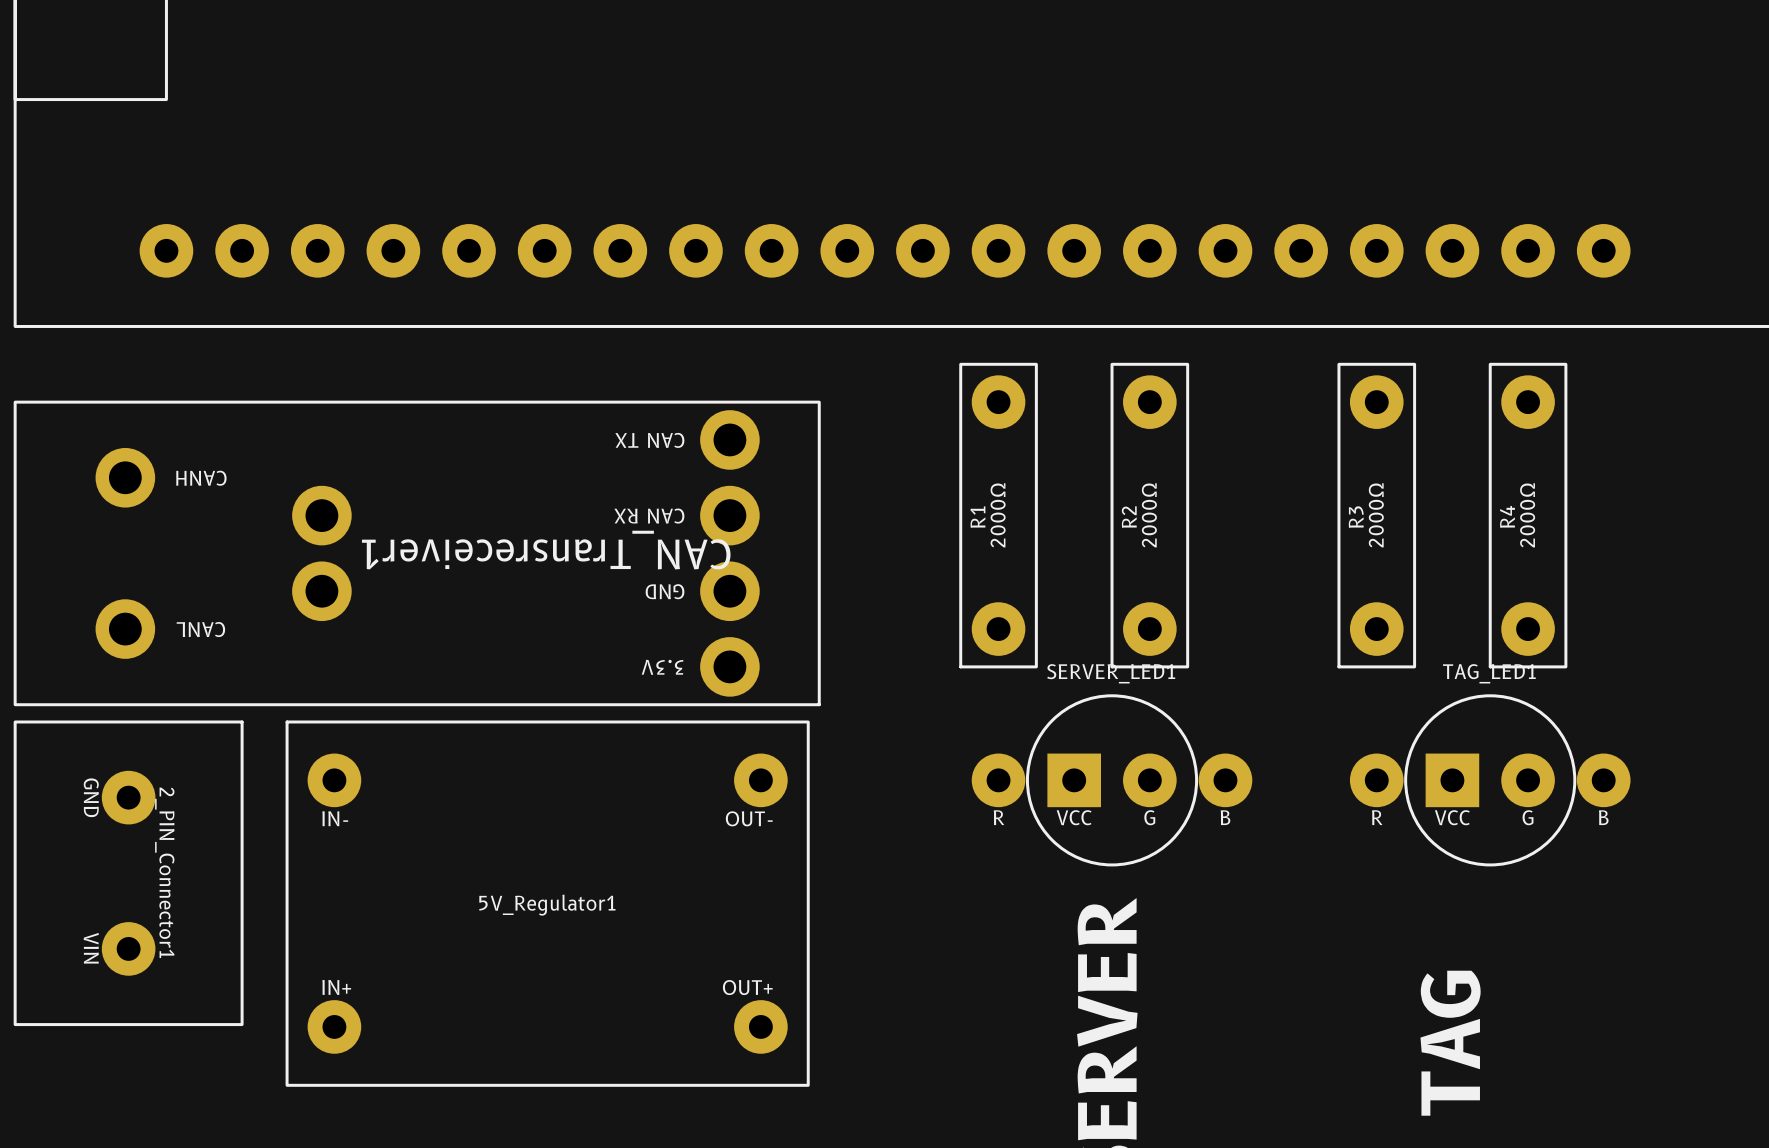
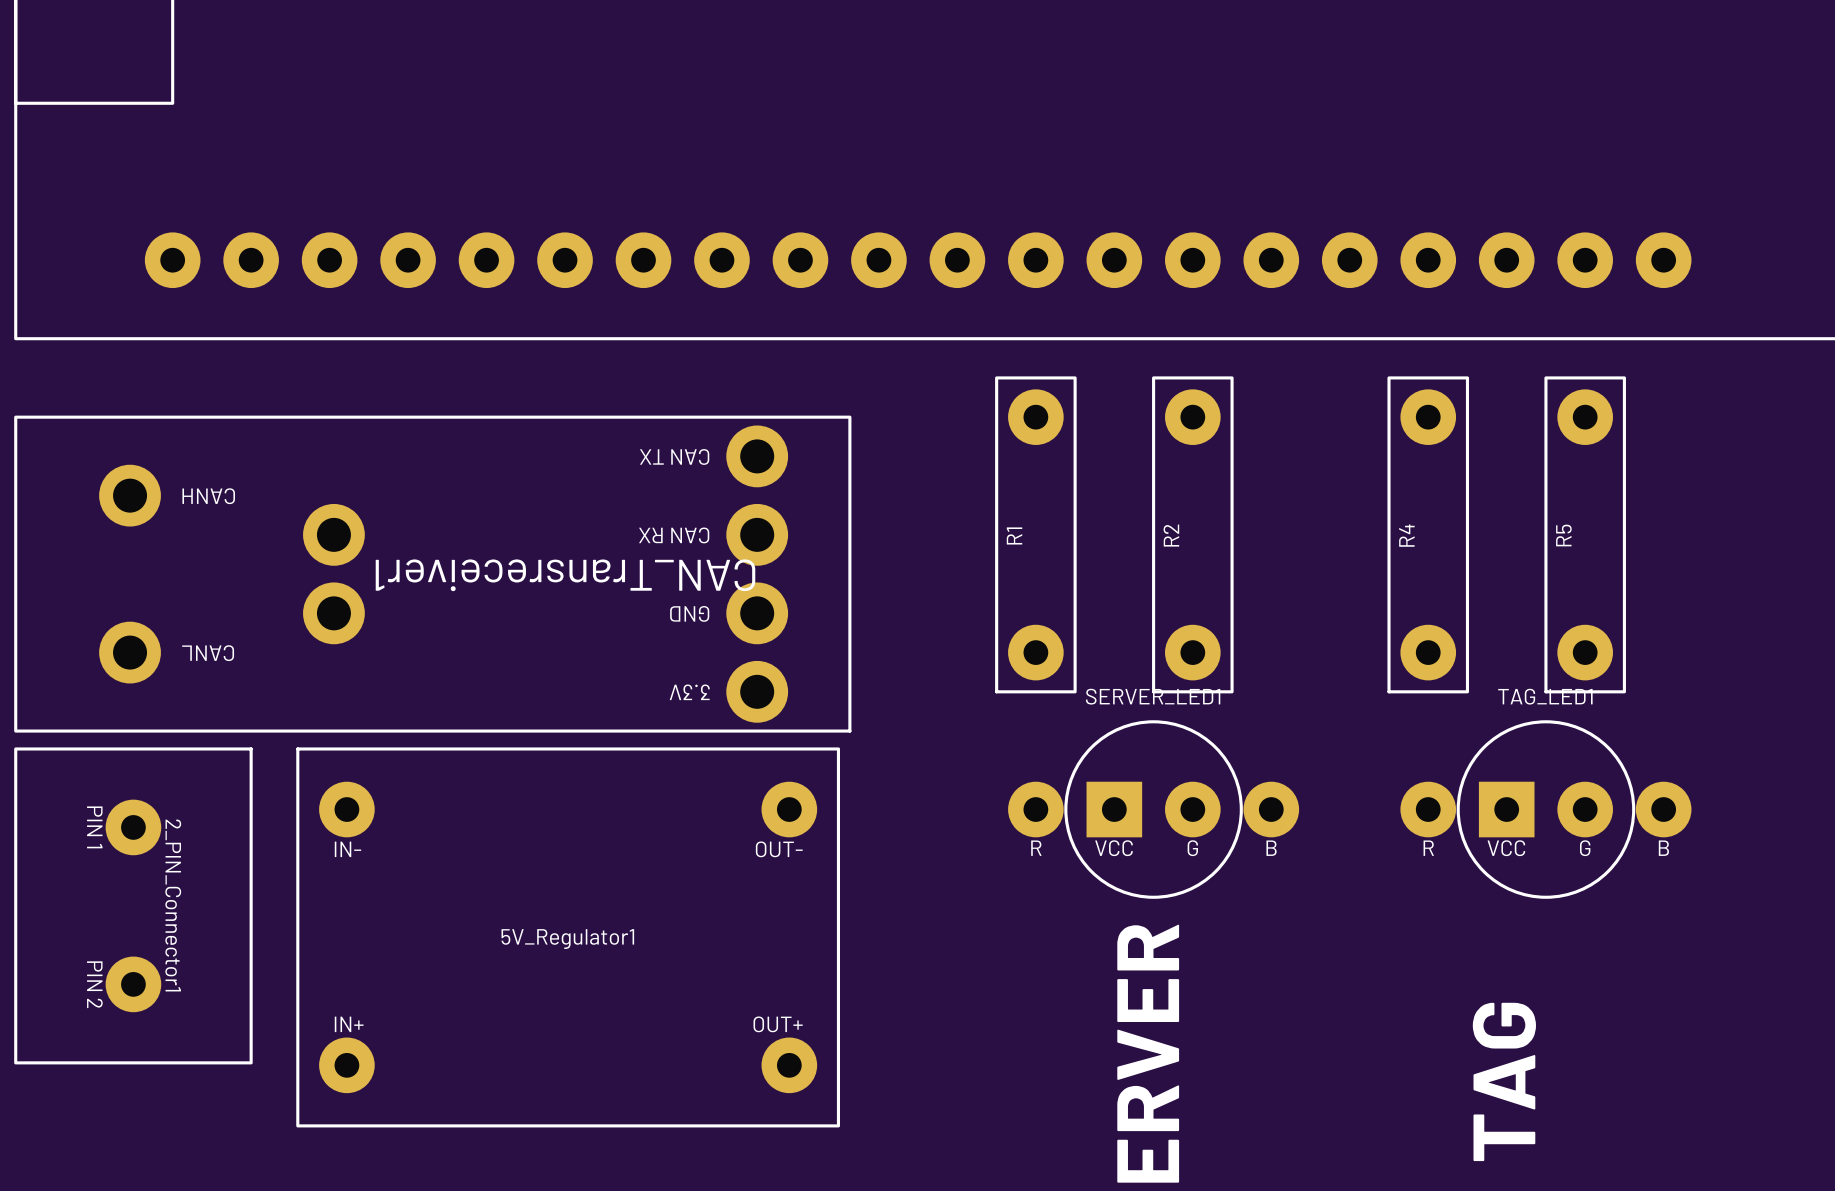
R1 value: 2000Ω (998, 515) -> none
R2 value: 2000Ω (1149, 515) -> none
R3 value: 2000Ω (1376, 515) -> none
R4 value: 2000Ω (1527, 515) -> none
R4 name: R4 (1507, 516) -> R5 (1563, 535)
R3 name: R3 (1356, 517) -> R4 (1406, 535)
2_PIN_Connector1 text: GND (91, 797) -> PIN 1 (94, 827)
2_PIN_Connector1 text: VIN (91, 948) -> PIN 2 (94, 984)

